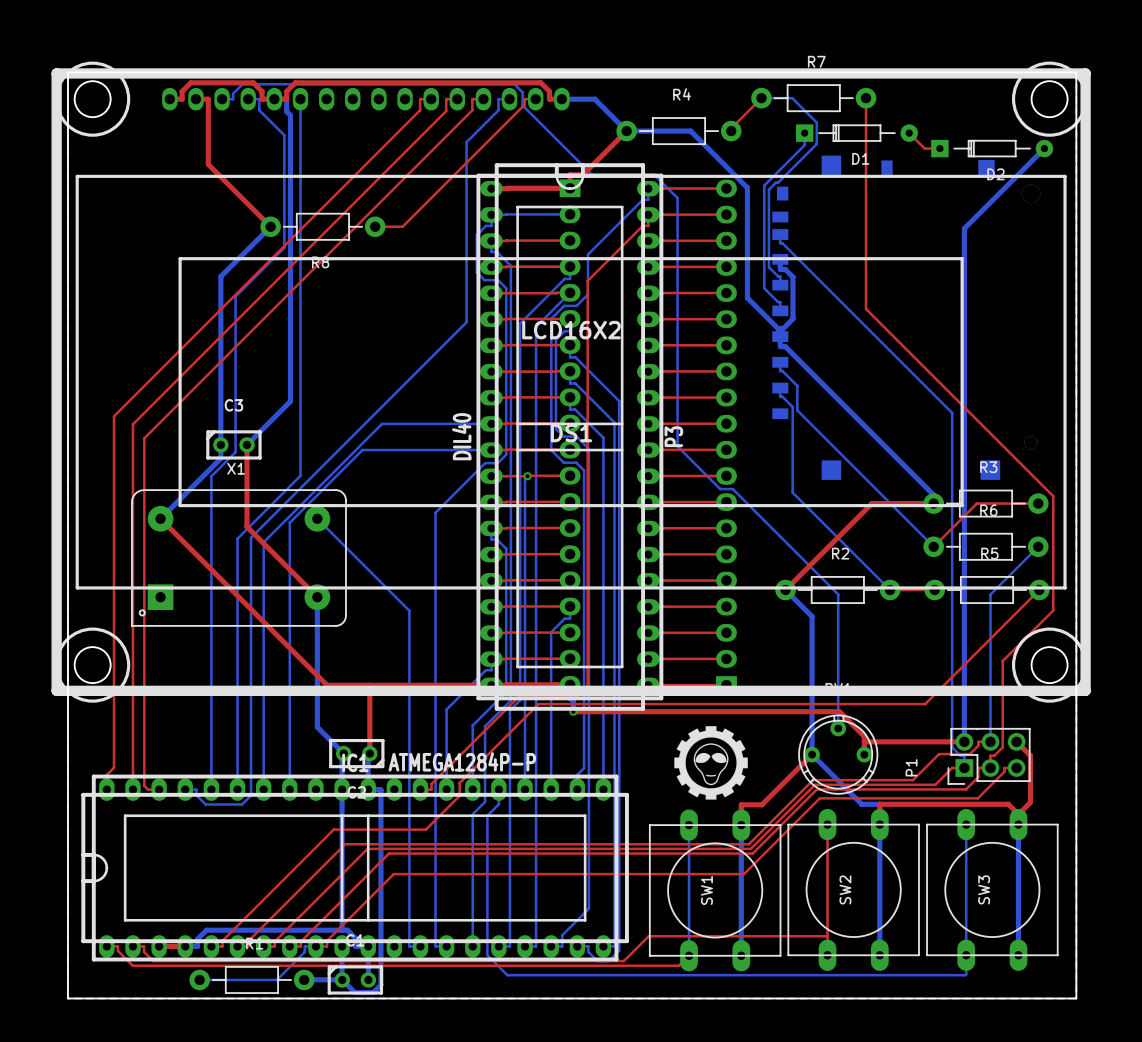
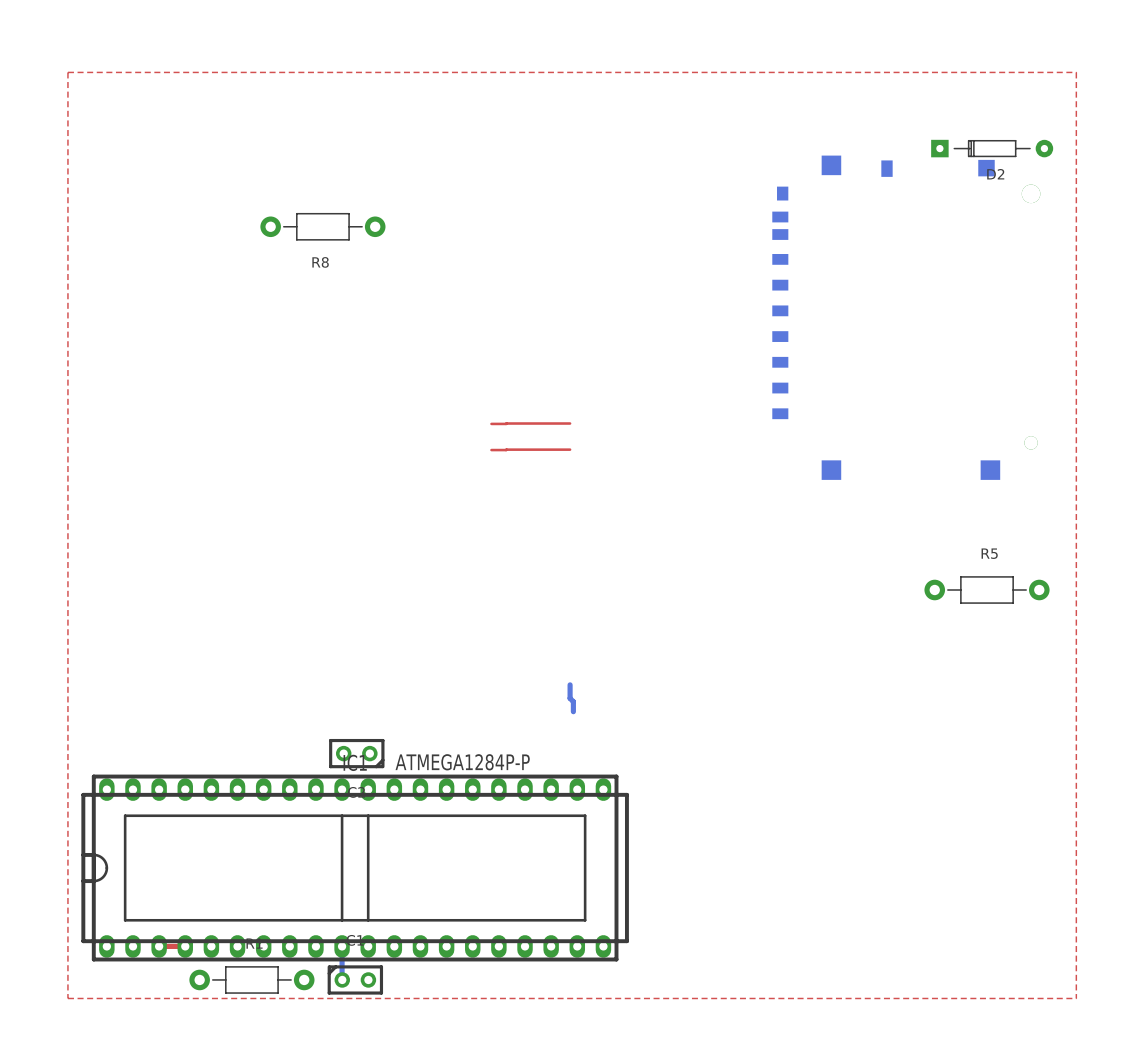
board edge: (67, 72) (67, 998) (1076, 998) (1076, 72) (67, 72) -> none
bottom track: (761, 98) (792, 98) (816, 122) (816, 144) (768, 189) (768, 267) (780, 276) (780, 285) -> none
top track: (761, 98) (731, 128) (731, 131) -> none
R7: (813, 98) -> none
top track: (866, 98) (866, 308) (1053, 496) (1053, 610) (1002, 661) (1002, 747) (994, 755) (990, 755) (990, 768) (978, 768) (978, 777) (966, 789) (816, 789) (752, 853) (389, 853) (300, 941) (300, 946) (289, 946) -> none
top track: (169, 99) (182, 99) (182, 91) (190, 82) (253, 82) (262, 91) (262, 99) (286, 99) (286, 91) (295, 82) (540, 82) (549, 91) (549, 99) (561, 99) -> none
top track: (195, 99) (208, 99) (208, 164) (270, 226) -> none
bottom track: (222, 99) (233, 99) (233, 93) (242, 84) (514, 84) (522, 92) (522, 105) (591, 174) (654, 174) (677, 198) (677, 446) (720, 489) (732, 489) (838, 594) (838, 728) -> none
bottom track: (248, 99) (259, 99) (259, 110) (284, 135) (284, 247) (235, 296) (235, 452) (211, 476) (211, 789) -> none
bottom track: (274, 99) (286, 99) (286, 111) (290, 115) (290, 401) (247, 444) -> none
bottom track: (300, 99) (300, 475) (237, 538) (237, 789) -> none
top track: (431, 99) (420, 99) (420, 110) (114, 416) (114, 767) (106, 774) (106, 789) -> none
top track: (457, 99) (446, 99) (446, 111) (132, 424) (132, 789) -> none
top track: (483, 99) (472, 99) (472, 110) (144, 438) (144, 785) (148, 789) (159, 789) -> none
bottom track: (509, 99) (498, 99) (498, 110) (466, 142) (466, 322) (251, 537) (251, 795) (242, 804) (205, 804) (196, 795) (196, 789) (185, 789) -> none
top track: (535, 99) (524, 99) (524, 104) (402, 226) (375, 226) -> none
bottom track: (561, 99) (594, 99) (626, 131) (690, 131) (747, 187) (747, 297) (778, 328) (782, 328) (792, 318) (792, 277) (785, 269) (780, 269) (780, 259) -> none
top track: (626, 131) (582, 174) (570, 174) (570, 188) (491, 188) -> none
R4: (678, 131) -> none
bottom track: (804, 133) (804, 145) (764, 185) (764, 288) (780, 302) (780, 310) -> none
D1: (856, 133) -> none
top track: (909, 133) (924, 148) (939, 148) -> none
bottom track: (1044, 148) (964, 228) (964, 741) -> none
bottom track: (648, 188) (648, 199) (642, 199) (587, 254) (587, 294) (576, 305) (564, 305) (551, 318) (551, 450) (563, 462) (576, 462) (584, 470) (584, 768) (577, 774) (577, 789) -> none
top track: (726, 188) (648, 188) -> none
bottom track: (570, 214) (491, 214) (491, 225) (485, 225) (476, 235) (476, 272) (484, 280) (498, 280) (506, 288) (506, 454) (497, 463) (485, 463) (435, 512) (435, 946) (446, 946) -> none
top track: (726, 214) (648, 214) (648, 225) (642, 225) (587, 280) (587, 686) (576, 697) (518, 697) (431, 784) (431, 789) (420, 789) -> none
bottom track: (270, 226) (220, 276) (220, 458) (160, 518) -> none
bottom track: (780, 234) (780, 243) (782, 243) (952, 412) (952, 747) (960, 755) (964, 755) (964, 768) -> none
bottom track: (491, 240) (491, 252) (497, 252) (510, 265) (510, 700) (485, 726) (485, 801) (472, 814) (472, 946) -> none
top track: (570, 240) (491, 240) -> none
top track: (726, 240) (648, 240) -> none
bottom track: (570, 266) (570, 278) (564, 278) (520, 323) (520, 700) (509, 710) (509, 946) (498, 946) -> none
top track: (570, 266) (491, 267) -> none
top track: (726, 266) (648, 267) -> none
bottom track: (570, 292) (536, 326) (536, 946) (525, 946) -> none
top track: (570, 292) (491, 293) -> none
top track: (726, 293) (648, 293) -> none
bottom track: (570, 318) (570, 331) (564, 331) (555, 339) (555, 428) (563, 436) (576, 436) (588, 448) (588, 908) (562, 935) (562, 946) (551, 946) -> none
top track: (570, 318) (491, 319) -> none
top track: (726, 319) (648, 319) -> none
bottom track: (780, 328) (780, 346) (785, 346) (933, 494) (933, 503) -> none
bottom track: (570, 345) (570, 357) (575, 357) (619, 401) (619, 950) (608, 961) (597, 961) (588, 951) (588, 946) (577, 946) -> none
top track: (570, 345) (491, 345) -> none
top track: (726, 345) (648, 345) -> none
bottom track: (780, 362) (780, 371) (797, 385) (797, 410) (933, 546) -> none
bottom track: (570, 371) (570, 383) (575, 383) (614, 422) (614, 946) (603, 946) -> none
top track: (570, 371) (491, 371) -> none
top track: (726, 371) (648, 371) -> none
DS1: LCD16X2 (571, 382) -> none
bottom track: (780, 388) (780, 396) (792, 406) (792, 492) (890, 589) -> none
bottom track: (570, 397) (570, 409) (575, 409) (603, 437) (603, 789) -> none
top track: (570, 397) (491, 397) -> none
top track: (726, 397) (648, 397) -> none
bottom track: (491, 423) (382, 423) (263, 542) (263, 789) -> none
top track: (726, 423) (648, 423) -> none
P3: DIL40 (569, 436) -> none
part: (570, 436) -> none
part: (726, 436) -> none
C3: (233, 444) -> none
top track: (247, 444) (247, 526) (317, 597) -> none
top track: (726, 449) (648, 450) -> none
bottom track: (491, 450) (362, 450) (289, 522) (289, 789) -> none
top track: (570, 475) (491, 476) -> none
top track: (726, 475) (648, 476) -> none
bottom track: (527, 476) (525, 478) (525, 789) -> none
via: (527, 476) -> none
top track: (570, 501) (491, 502) -> none
top track: (726, 502) (648, 502) -> none
top track: (933, 503) (871, 503) (785, 589) -> none
R3: (985, 503) -> none
top track: (1038, 503) (976, 503) (933, 546) -> none
top track: (160, 518) (327, 685) (570, 684) -> none
bottom track: (317, 518) (409, 610) (409, 946) (420, 946) -> none
bottom track: (491, 528) (491, 539) (497, 539) (506, 548) (506, 692) (472, 725) (472, 789) -> none
top track: (570, 528) (491, 528) -> none
top track: (726, 528) (648, 528) -> none
R6: (985, 546) -> none
bottom track: (1038, 546) (990, 594) (990, 741) -> none
top track: (570, 554) (491, 554) -> none
top track: (726, 554) (648, 554) -> none
X1: (238, 557) -> none
top track: (570, 580) (491, 580) -> none
top track: (726, 580) (648, 580) -> none
bottom track: (785, 589) (812, 616) (812, 754) (861, 804) (879, 804) (879, 955) -> none
R2: (837, 589) -> none
top track: (890, 589) (934, 589) -> none
top track: (1039, 589) (925, 704) (538, 704) (459, 783) (459, 795) (425, 829) (333, 829) (222, 940) (222, 946) (211, 946) -> none
bottom track: (317, 597) (317, 727) (343, 753) (342, 755) (342, 930) -> none
bottom track: (570, 606) (570, 618) (564, 618) (551, 632) (551, 789) -> none
top track: (570, 606) (491, 606) -> none
top track: (726, 606) (648, 606) -> none
top track: (570, 632) (491, 633) -> none
top track: (726, 632) (648, 633) -> none
top track: (570, 658) (491, 659) -> none
top track: (726, 658) (648, 659) -> none
bottom track: (491, 659) (491, 670) (485, 670) (446, 709) (446, 789) -> none
top track: (369, 685) (369, 753) -> none
top track: (726, 685) (648, 685) -> none
top track: (573, 711) (839, 711) (864, 736) (864, 754) -> none
via: (573, 711) -> none
drawing: [674, 726, 748, 800] -> none
top track: (864, 741) (964, 741) -> none
top track: (990, 741) (978, 741) (978, 745) (969, 754) (939, 754) (912, 780) (813, 780) (748, 844) (345, 844) (248, 940) (248, 946) (237, 946) -> none
top track: (1016, 741) (1030, 755) (1030, 802) (1018, 814) -> none
bottom track: (369, 753) (368, 755) (368, 789) (380, 790) (380, 984) (373, 992) (354, 992) (342, 979) (304, 979) -> none
top track: (812, 754) (761, 804) (741, 804) (741, 825) -> none
part: (838, 754) -> none
P1: (989, 756) -> none
top track: (964, 768) (952, 768) (935, 784) (814, 784) (750, 848) (367, 848) (274, 941) (274, 946) (263, 946) -> none
top track: (1016, 768) (1004, 768) (1004, 771) (977, 798) (819, 798) (744, 874) (393, 874) (327, 940) (327, 946) (315, 946) -> none
bottom track: (498, 789) (498, 804) (487, 815) (487, 955) (507, 975) (965, 975) (966, 824) -> none
top track: (1018, 814) (1008, 804) (879, 804) (879, 824) -> none
top track: (827, 824) (827, 955) -> none
bottom track: (1018, 824) (1018, 955) -> none
bottom track: (689, 825) (689, 955) -> none
bottom track: (741, 825) (741, 955) -> none
SW2: (853, 889) -> none
SW3: (992, 889) -> none
SW1: (715, 890) -> none
top track: (827, 936) (648, 936) (623, 961) (153, 961) (144, 951) (144, 946) (132, 946) -> none
top track: (106, 946) (117, 946) (117, 950) (132, 965) (679, 965) (689, 955) -> none
bottom track: (185, 946) (197, 946) (197, 939) (206, 930) (347, 930) (355, 938) (355, 946) (368, 946) (368, 979) -> none
bottom track: (315, 946) (304, 946) (304, 951) (276, 979) (199, 979) -> none

